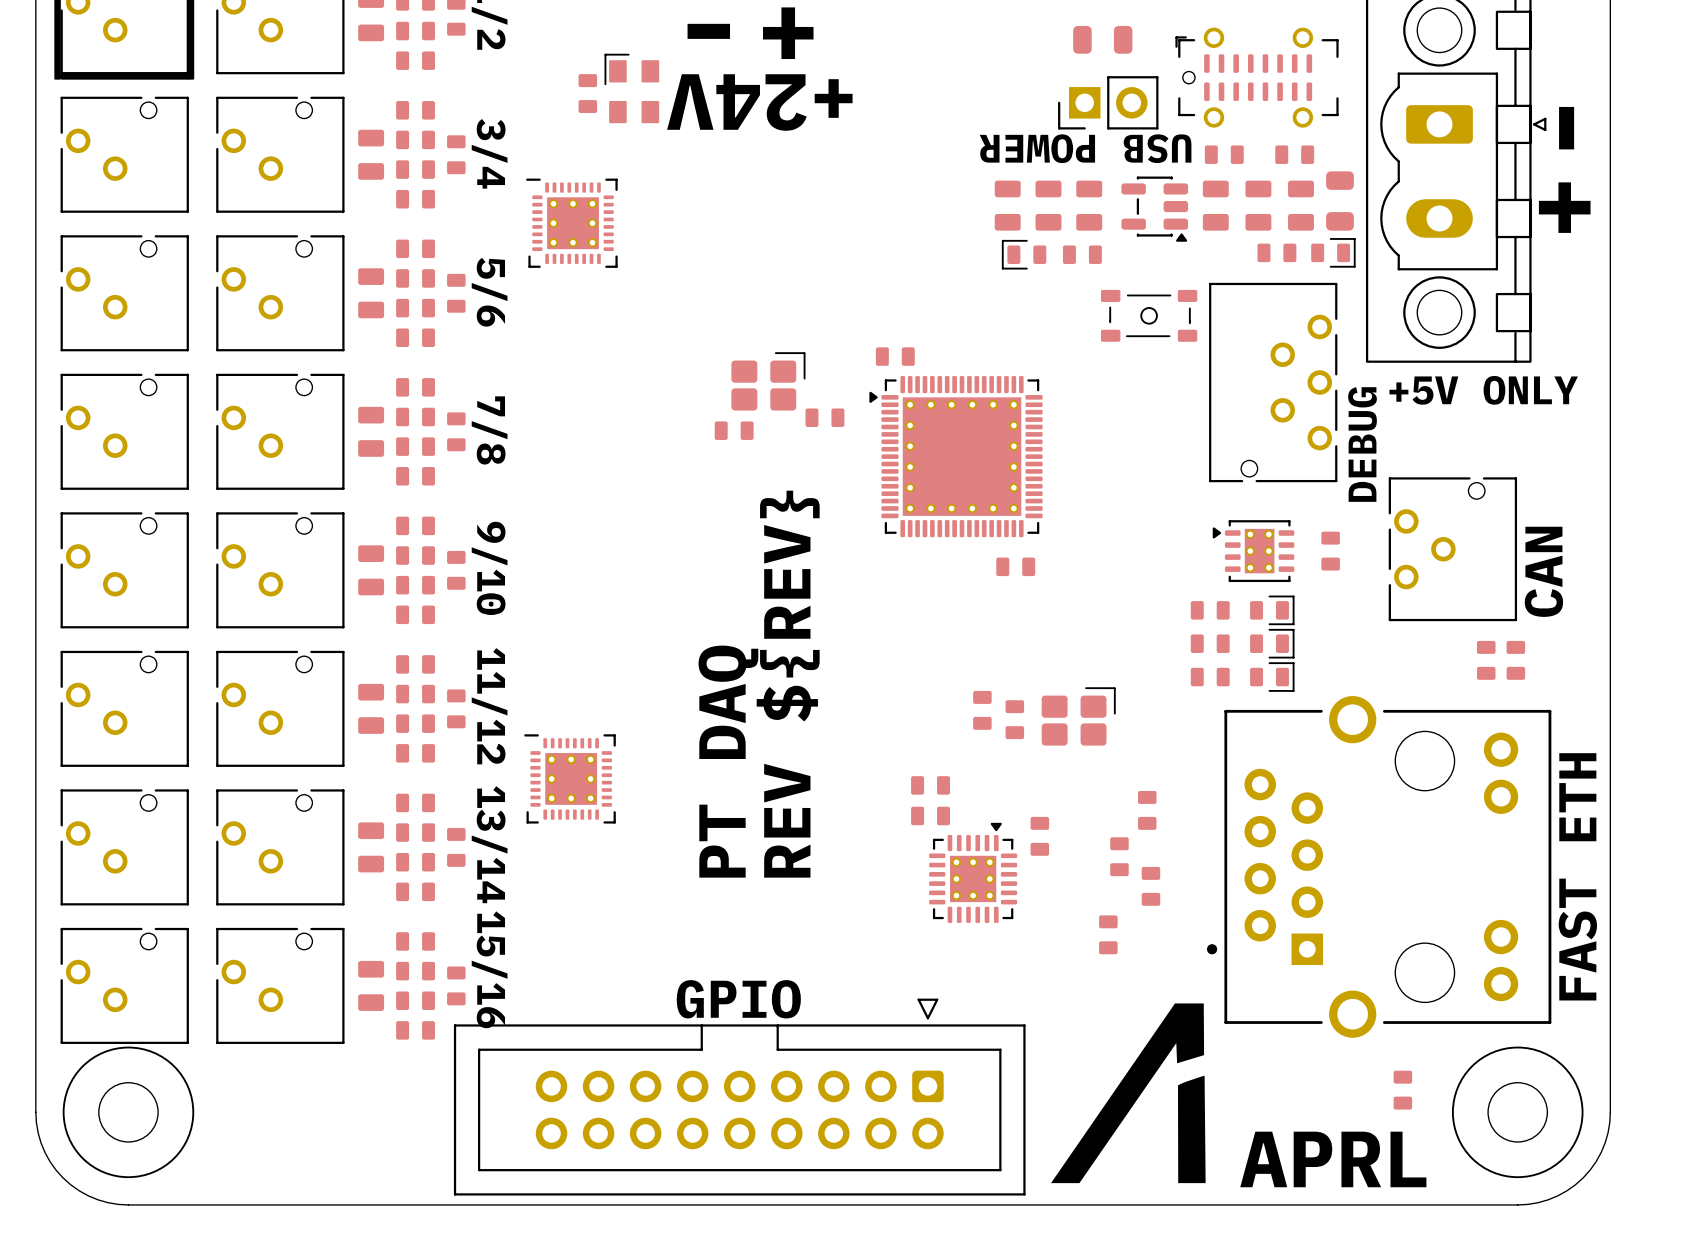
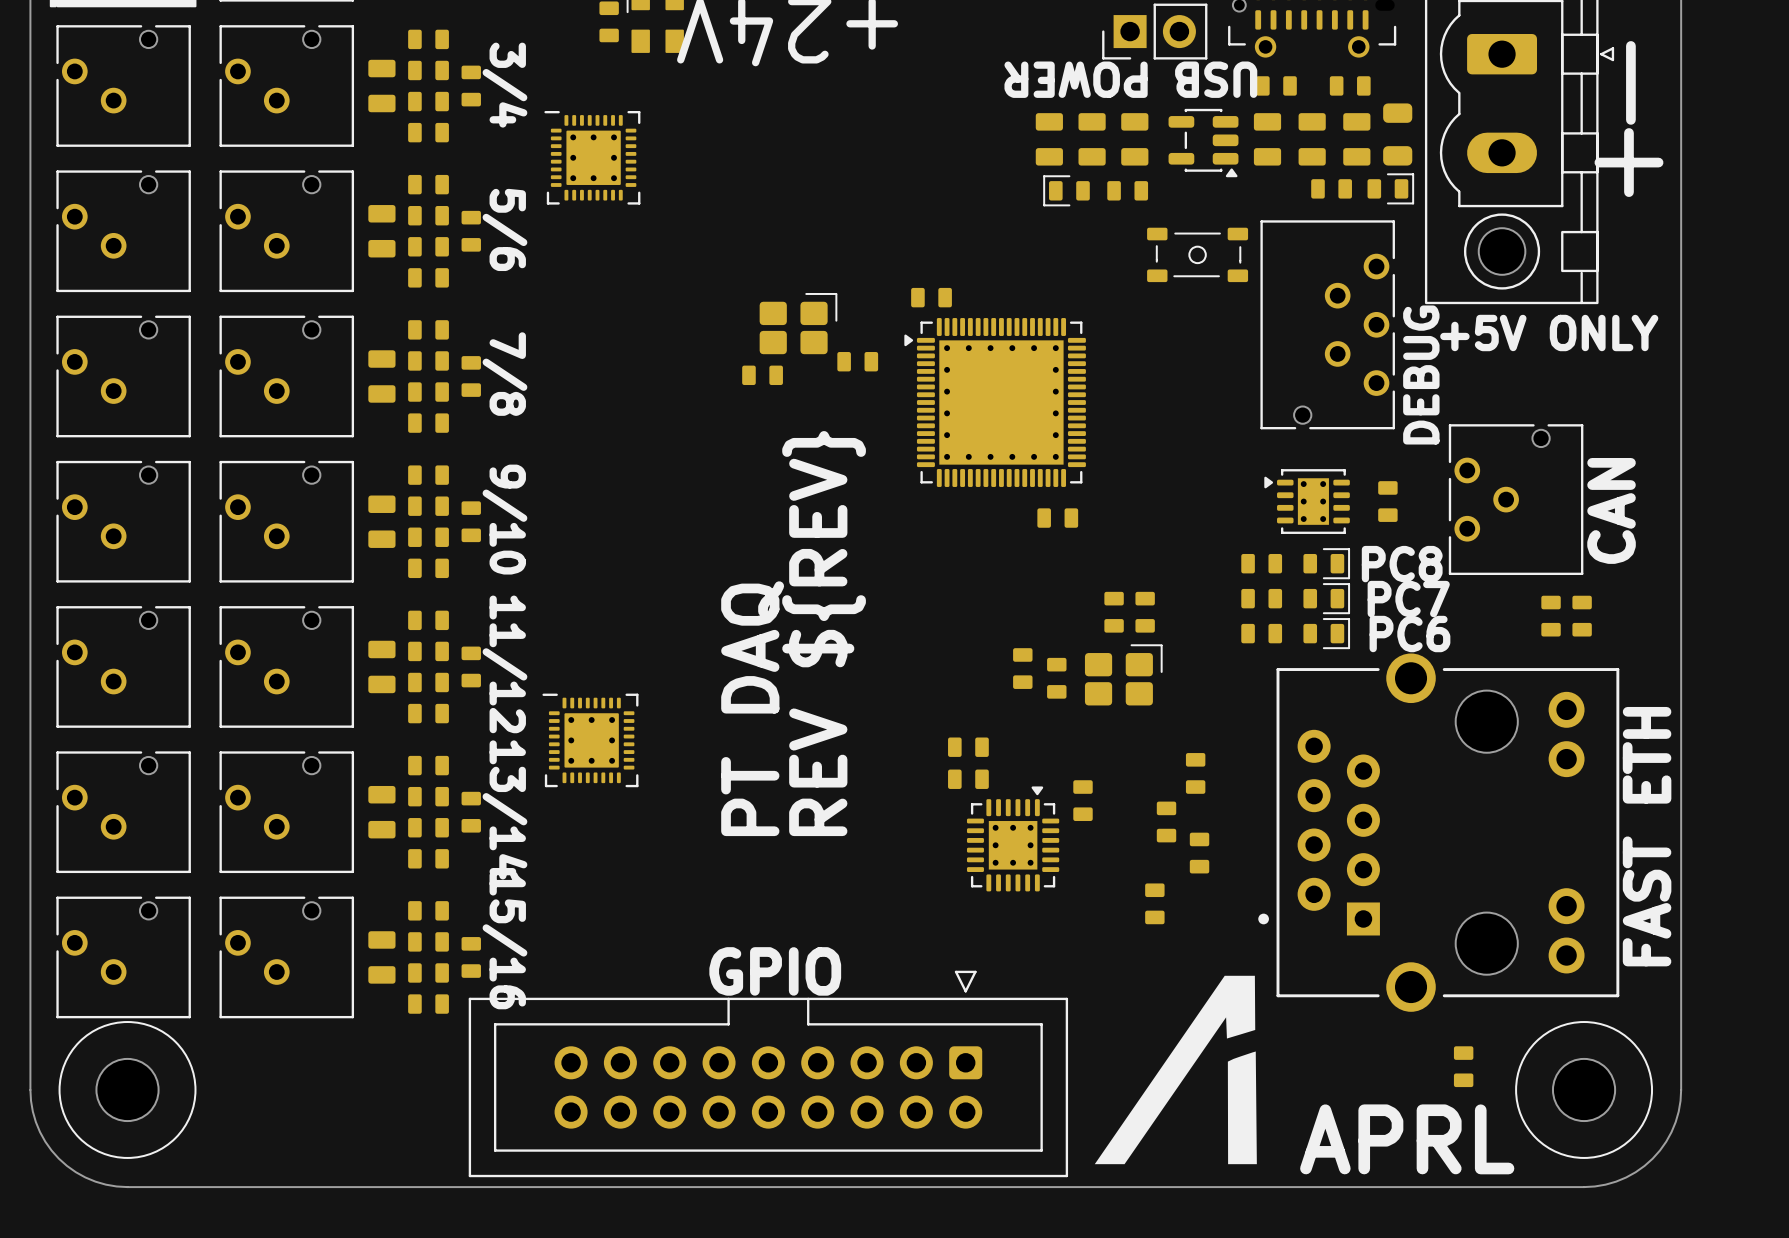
text: none -> PC8 (1402, 564)
text: none -> PC7 (1408, 599)
part: none -> (1114, 612)
part: none -> (1145, 612)
text: none -> PC6 (1409, 634)

